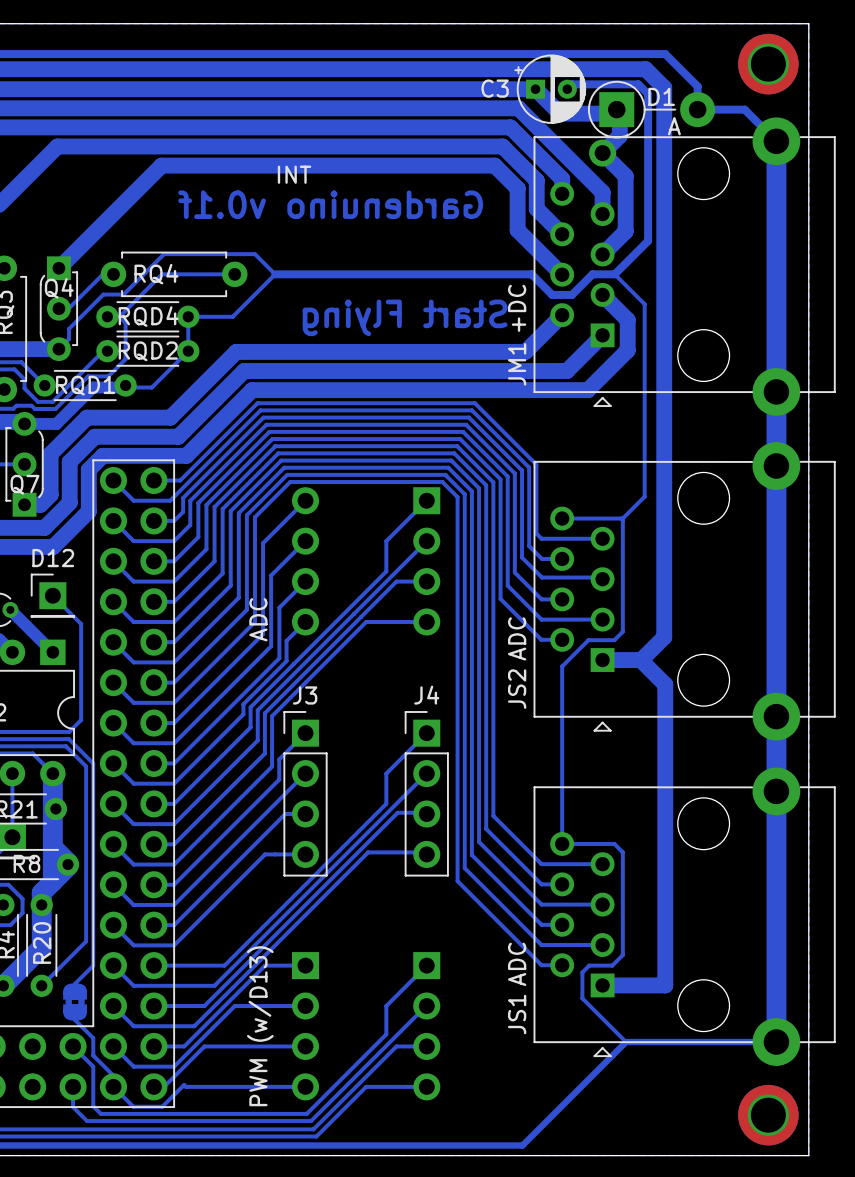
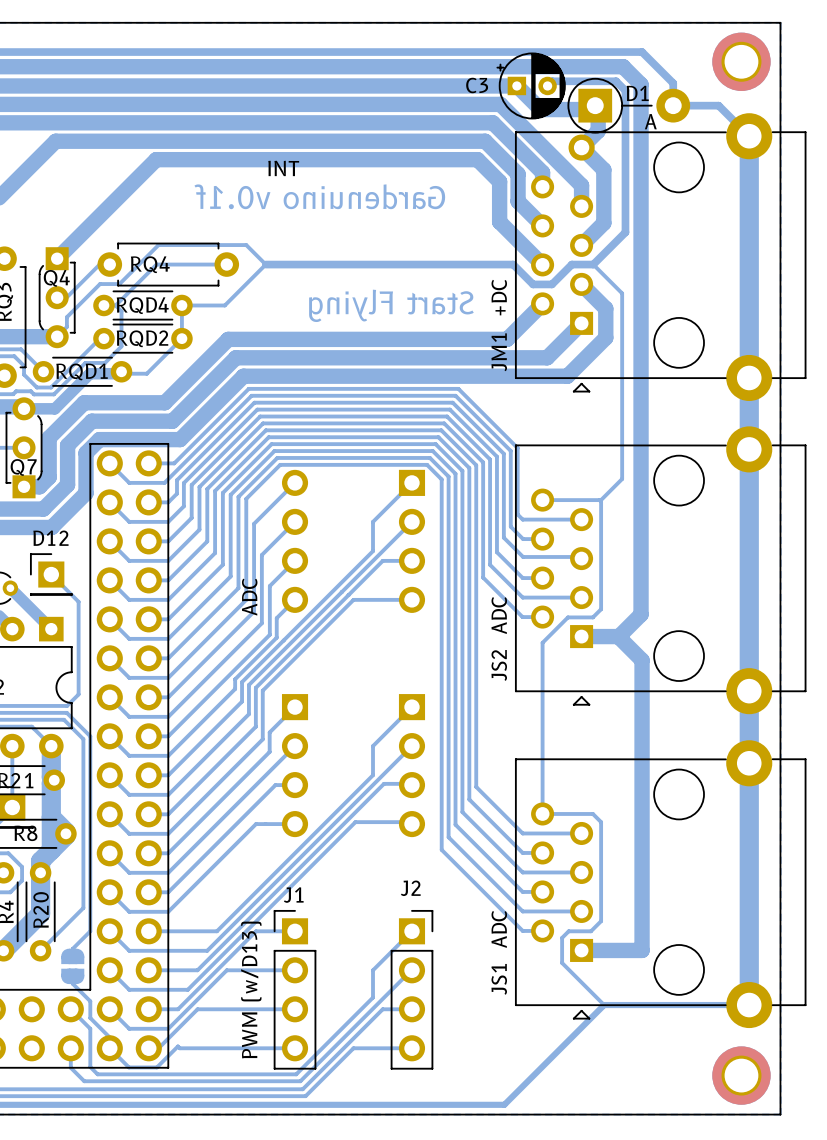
J3 side: top (305, 793) -> bottom (295, 765)
J4 side: top (426, 793) -> bottom (411, 765)
part footprint: [63, 983, 88, 1021] -> [61, 948, 85, 985]
J1 side: bottom (305, 1026) -> top (295, 989)
J2 side: bottom (426, 1026) -> top (411, 989)

